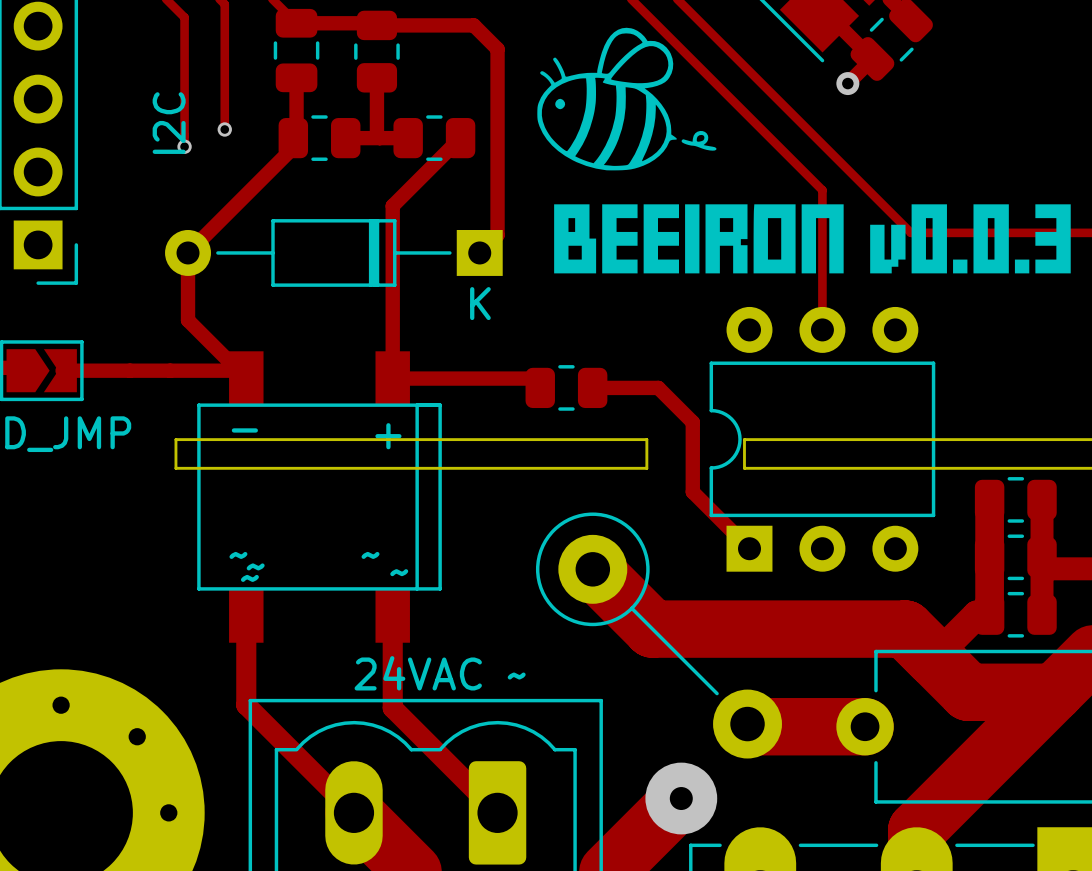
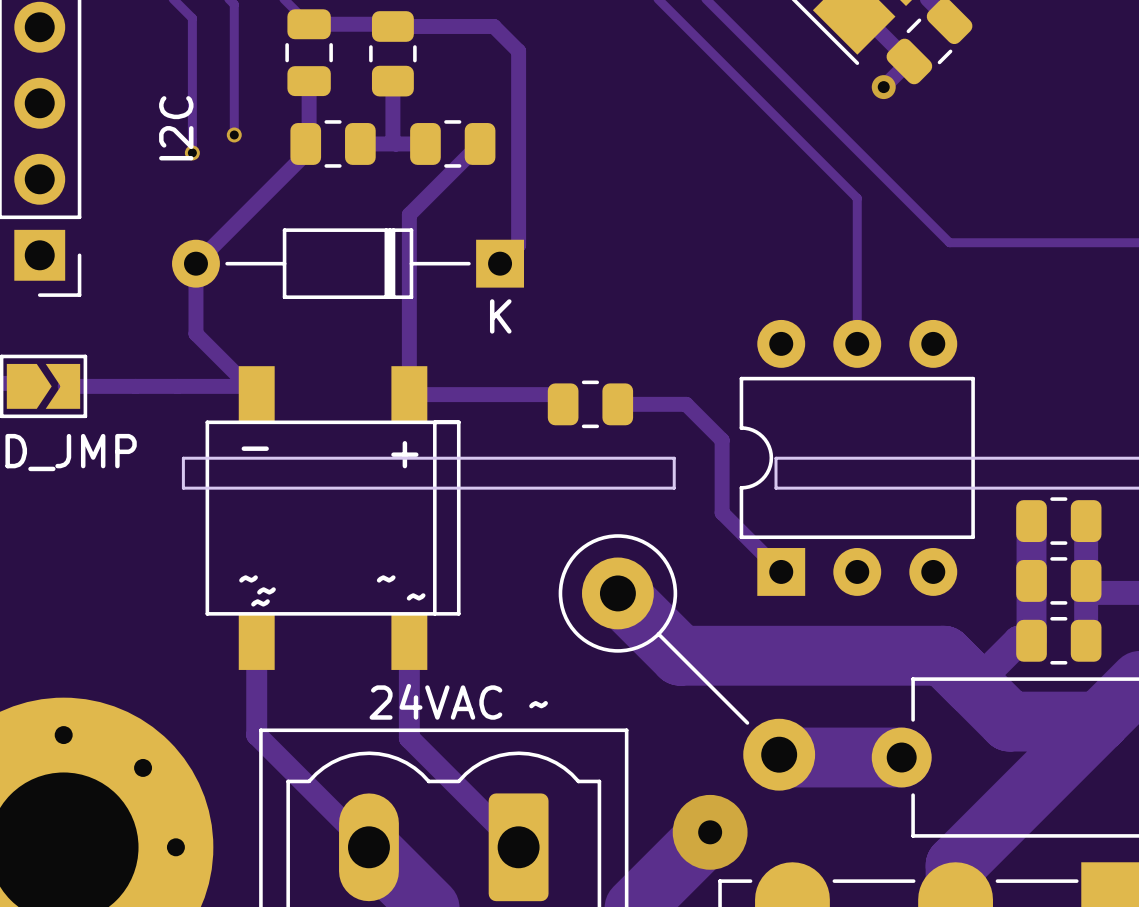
drawing: [537, 27, 1071, 274] -> none

